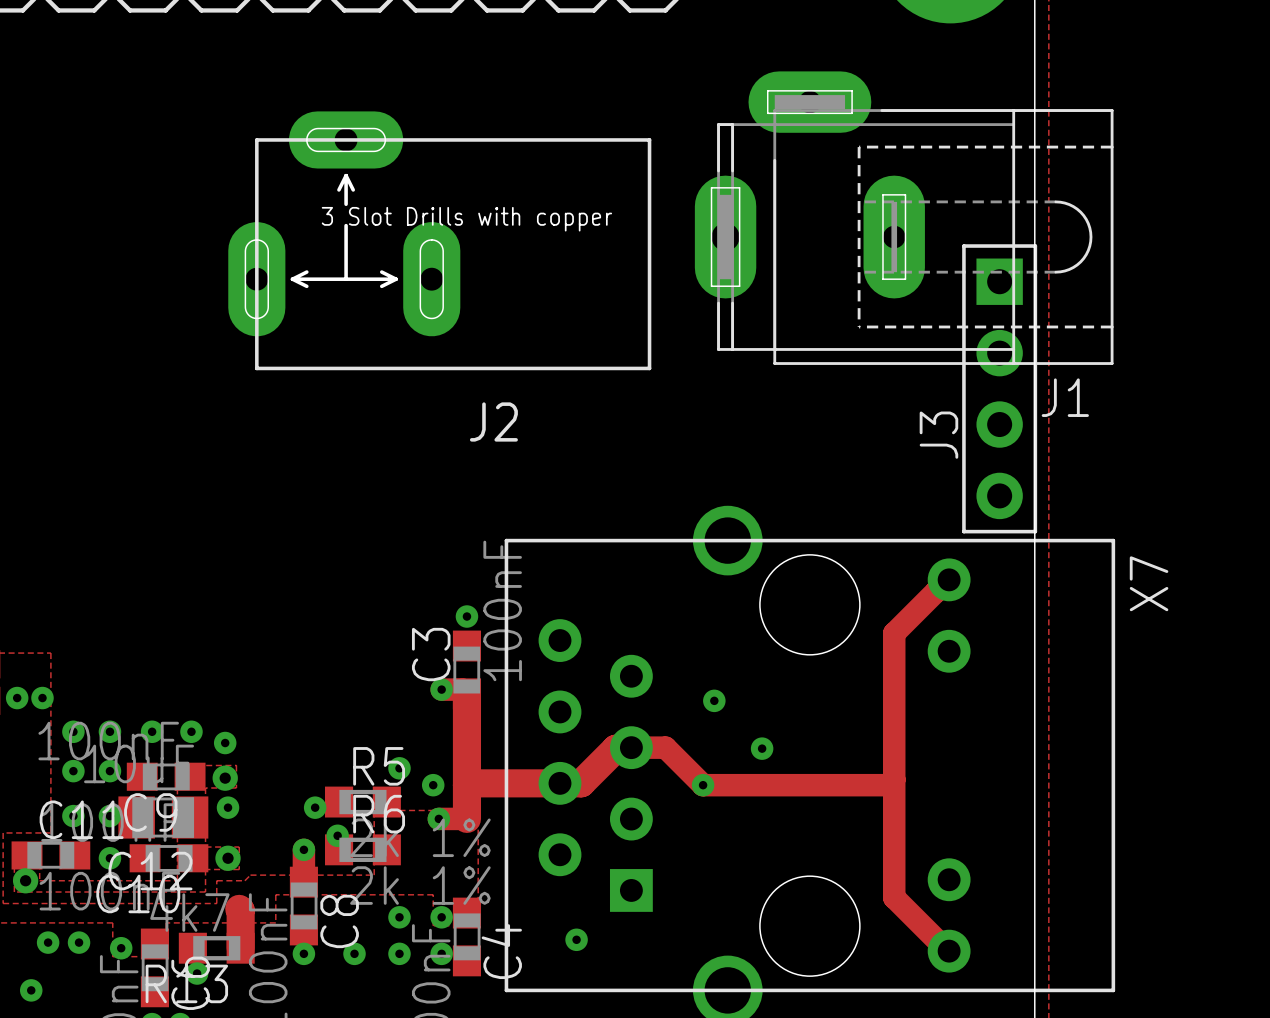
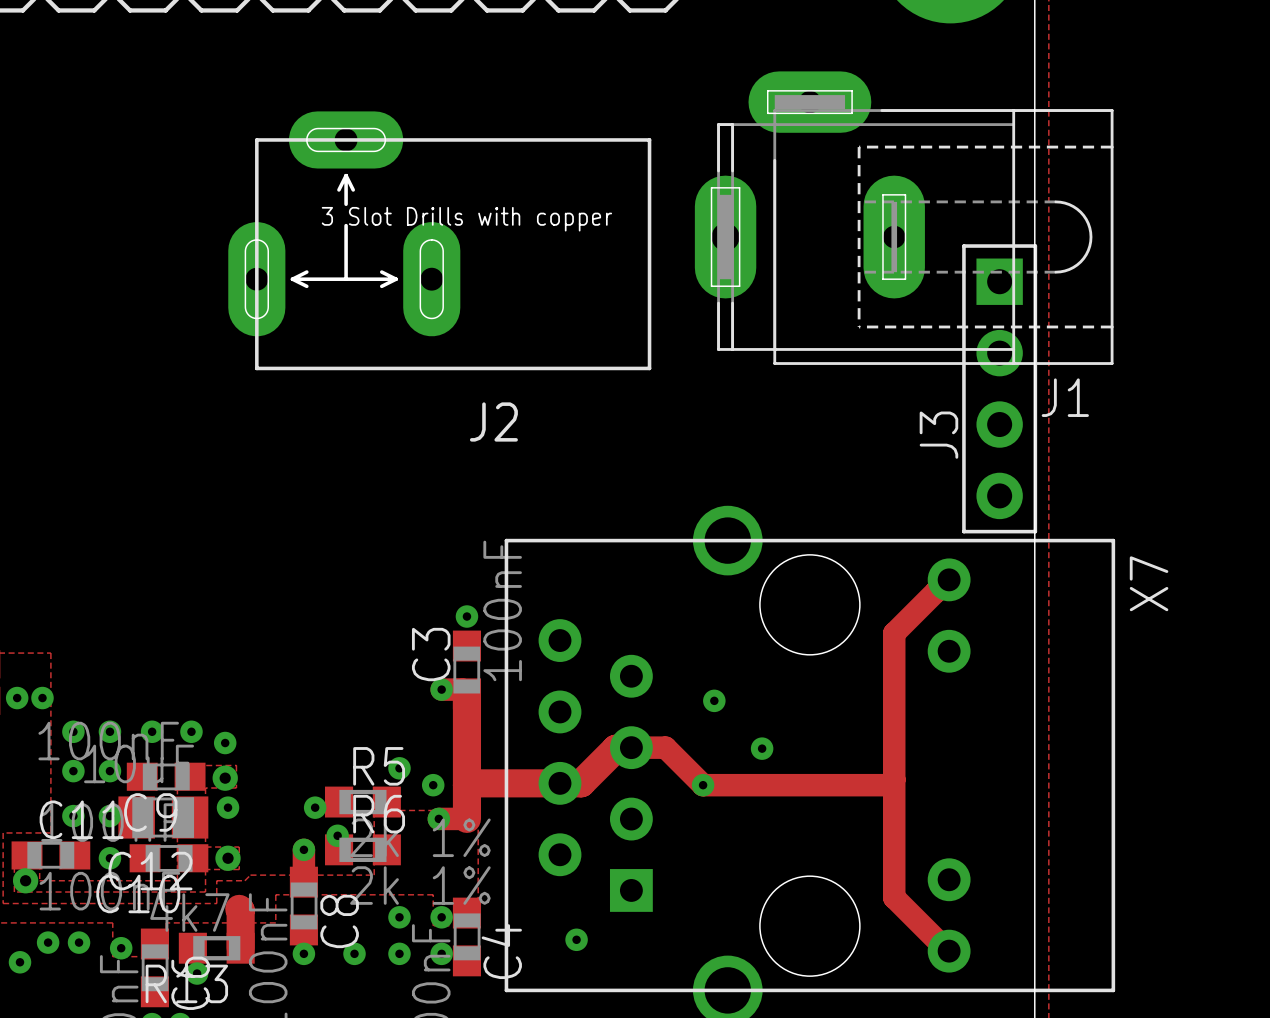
via position: (31, 990) -> (20, 962)

